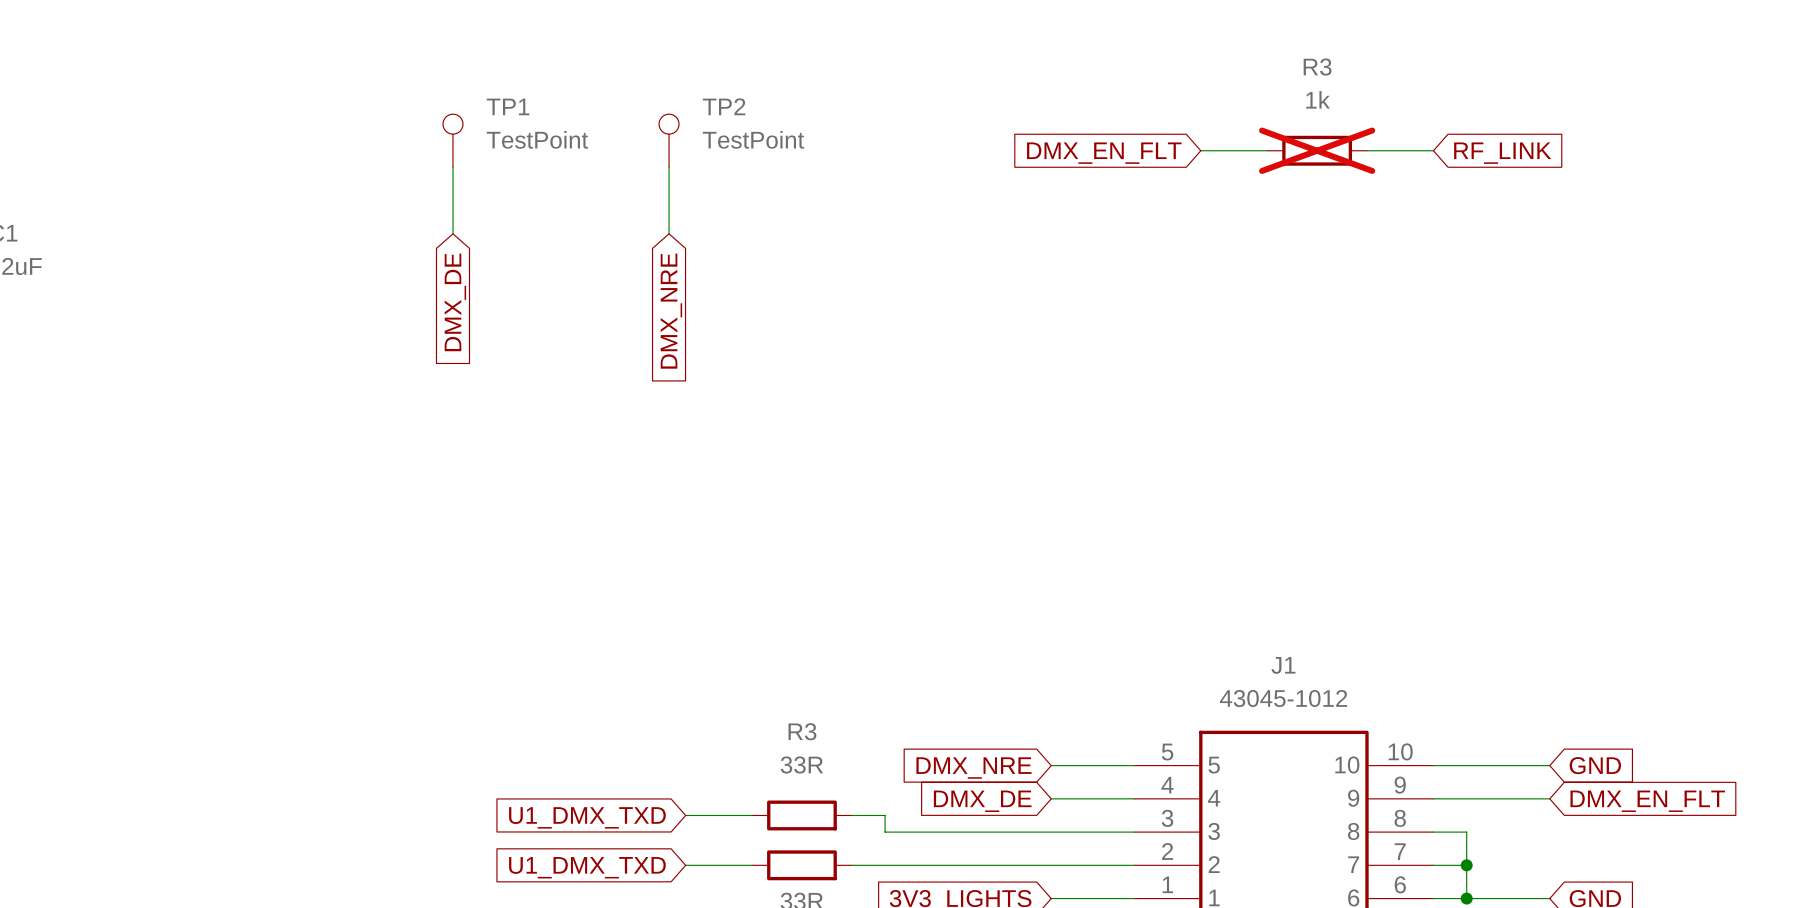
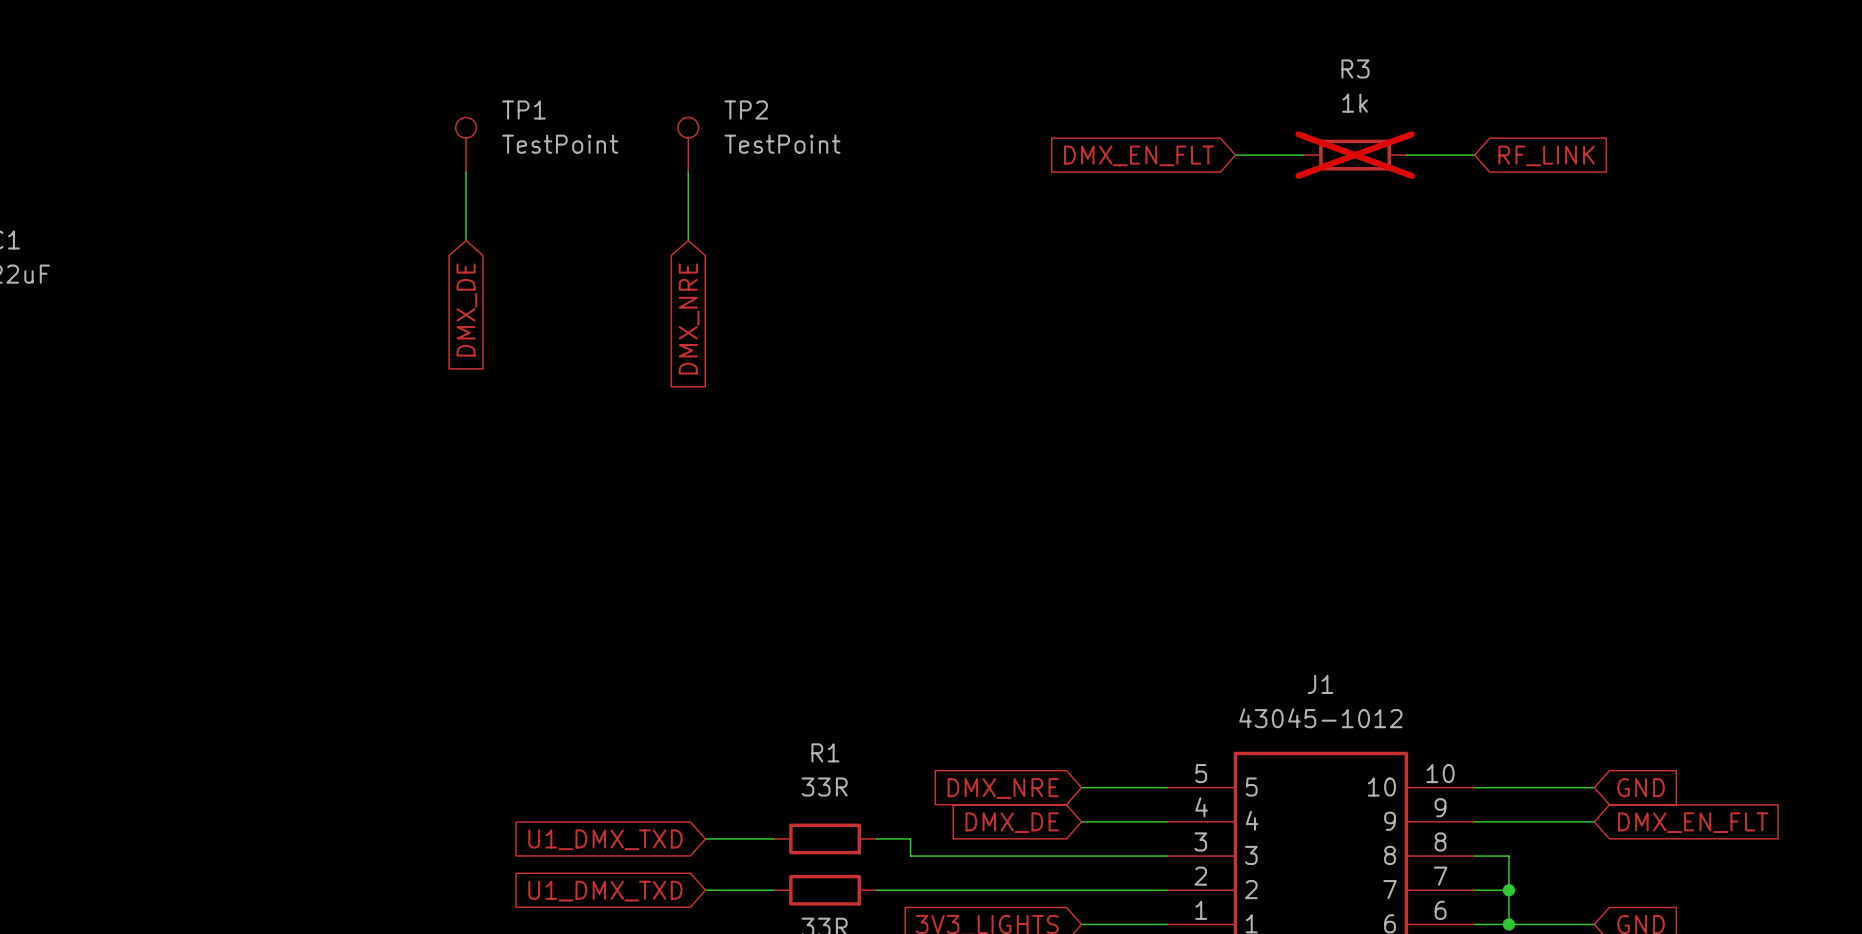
R3 name: R3 (802, 731) -> R1 (825, 752)

